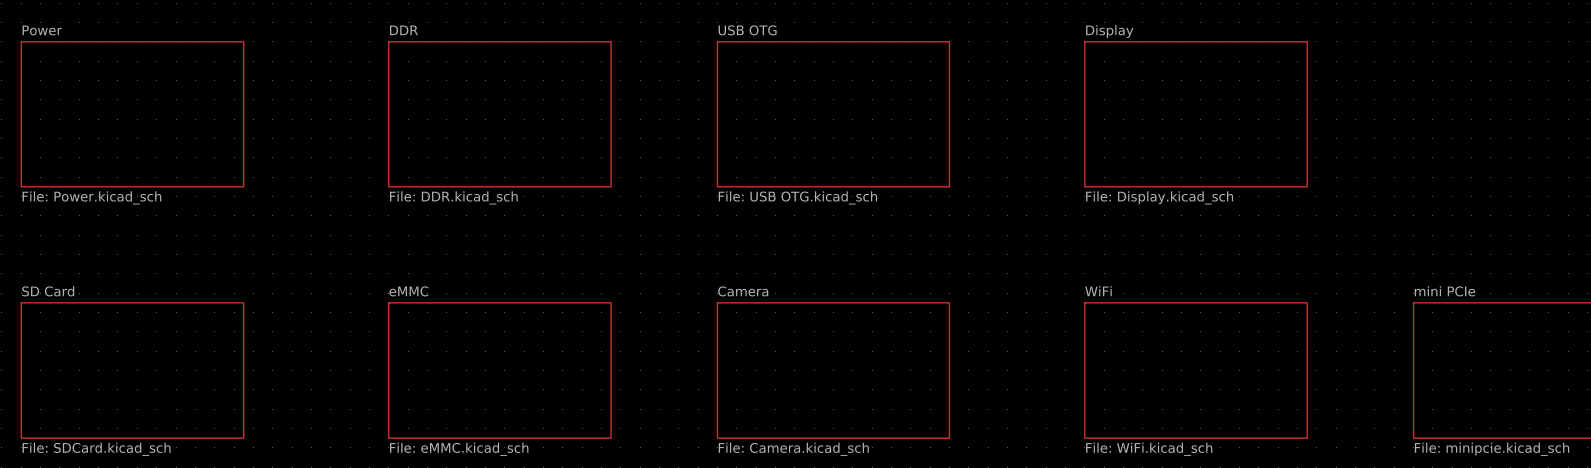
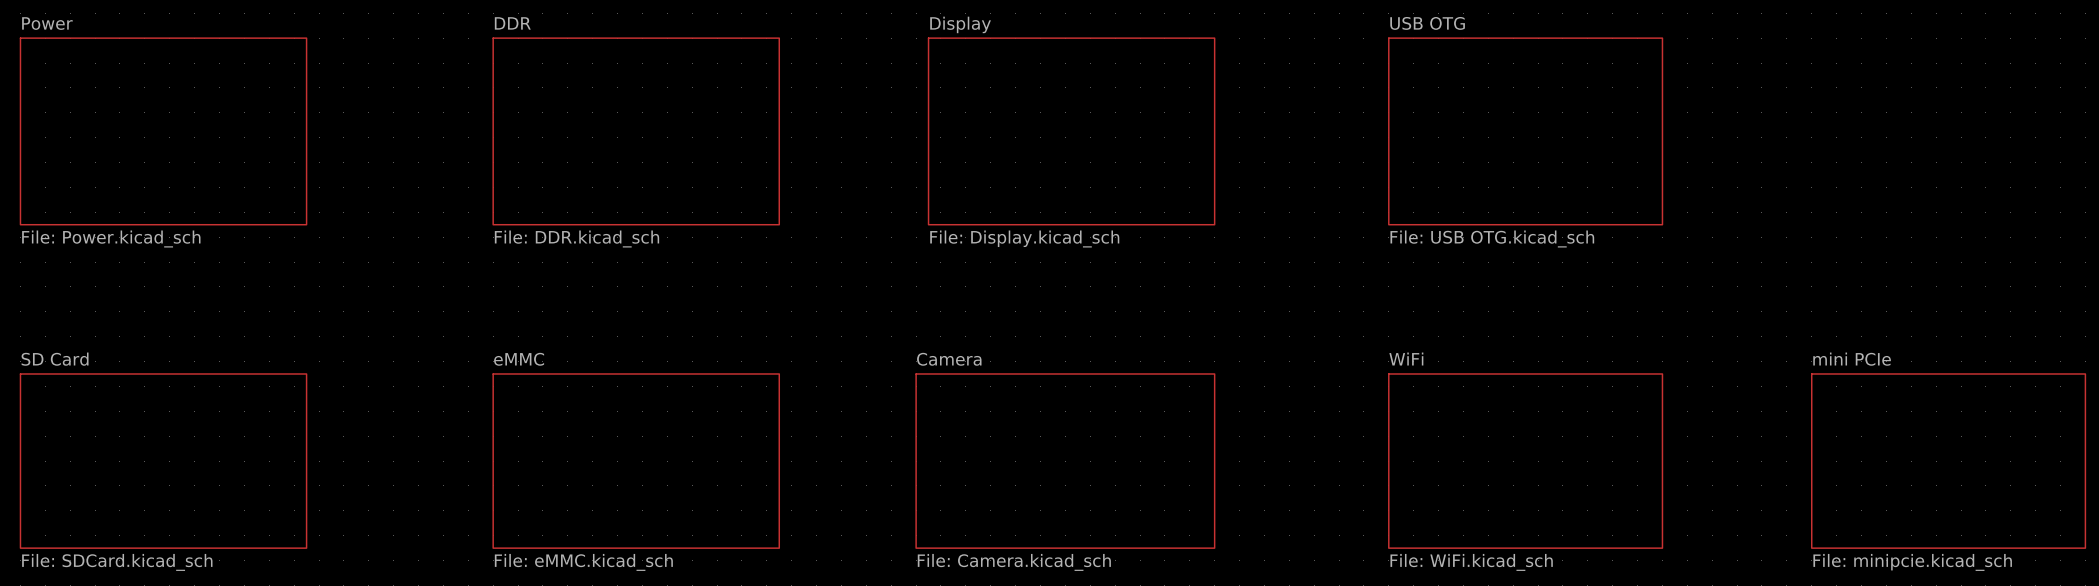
sheet USB OTG: File: USB OTG.kicad_sch (833, 114) -> none
sheet Display: none -> File: Display.kicad_sch (1071, 131)
sheet USB OTG: none -> File: USB OTG.kicad_sch (1525, 131)
sheet Display: File: Display.kicad_sch (1196, 114) -> none
sheet WiFi shape: [1084, 302, 1308, 439] -> [1388, 373, 1664, 549]

